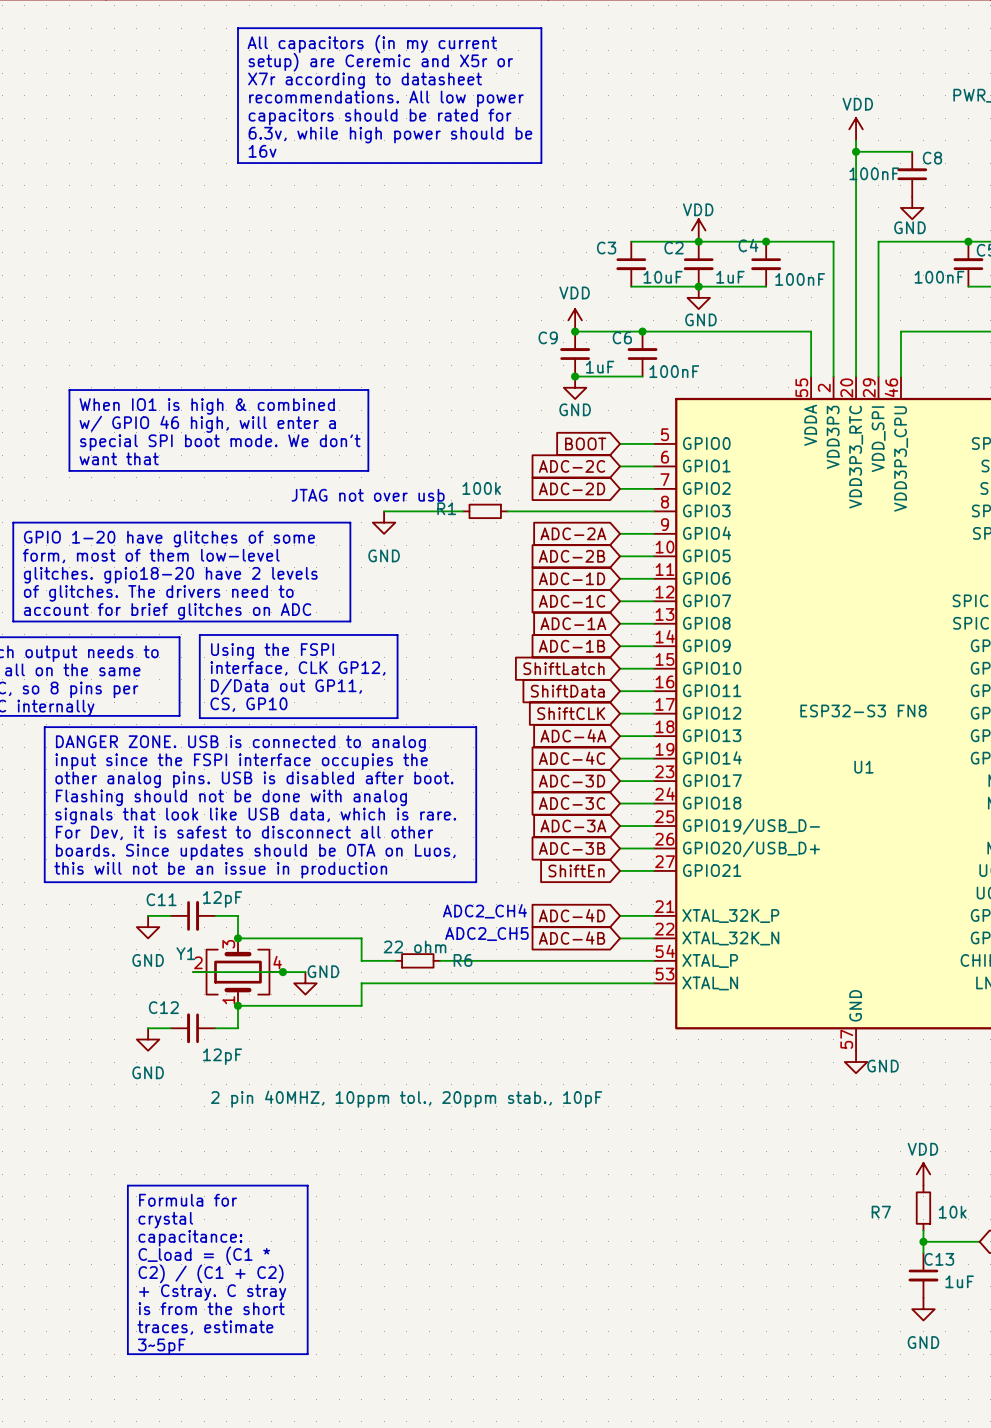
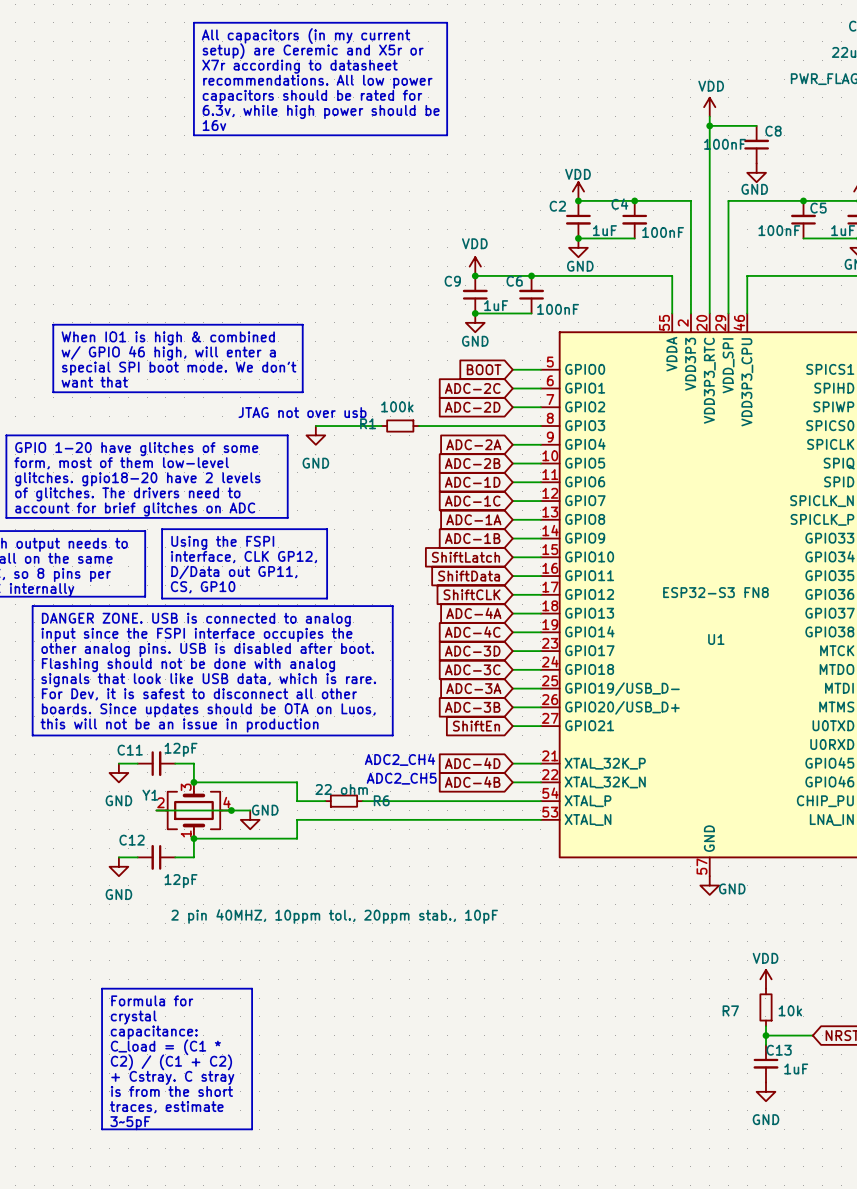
wire: (631, 241) (698, 241) -> none
C3: 10uF (631, 264) -> none
wire: (631, 286) (698, 286) -> none

